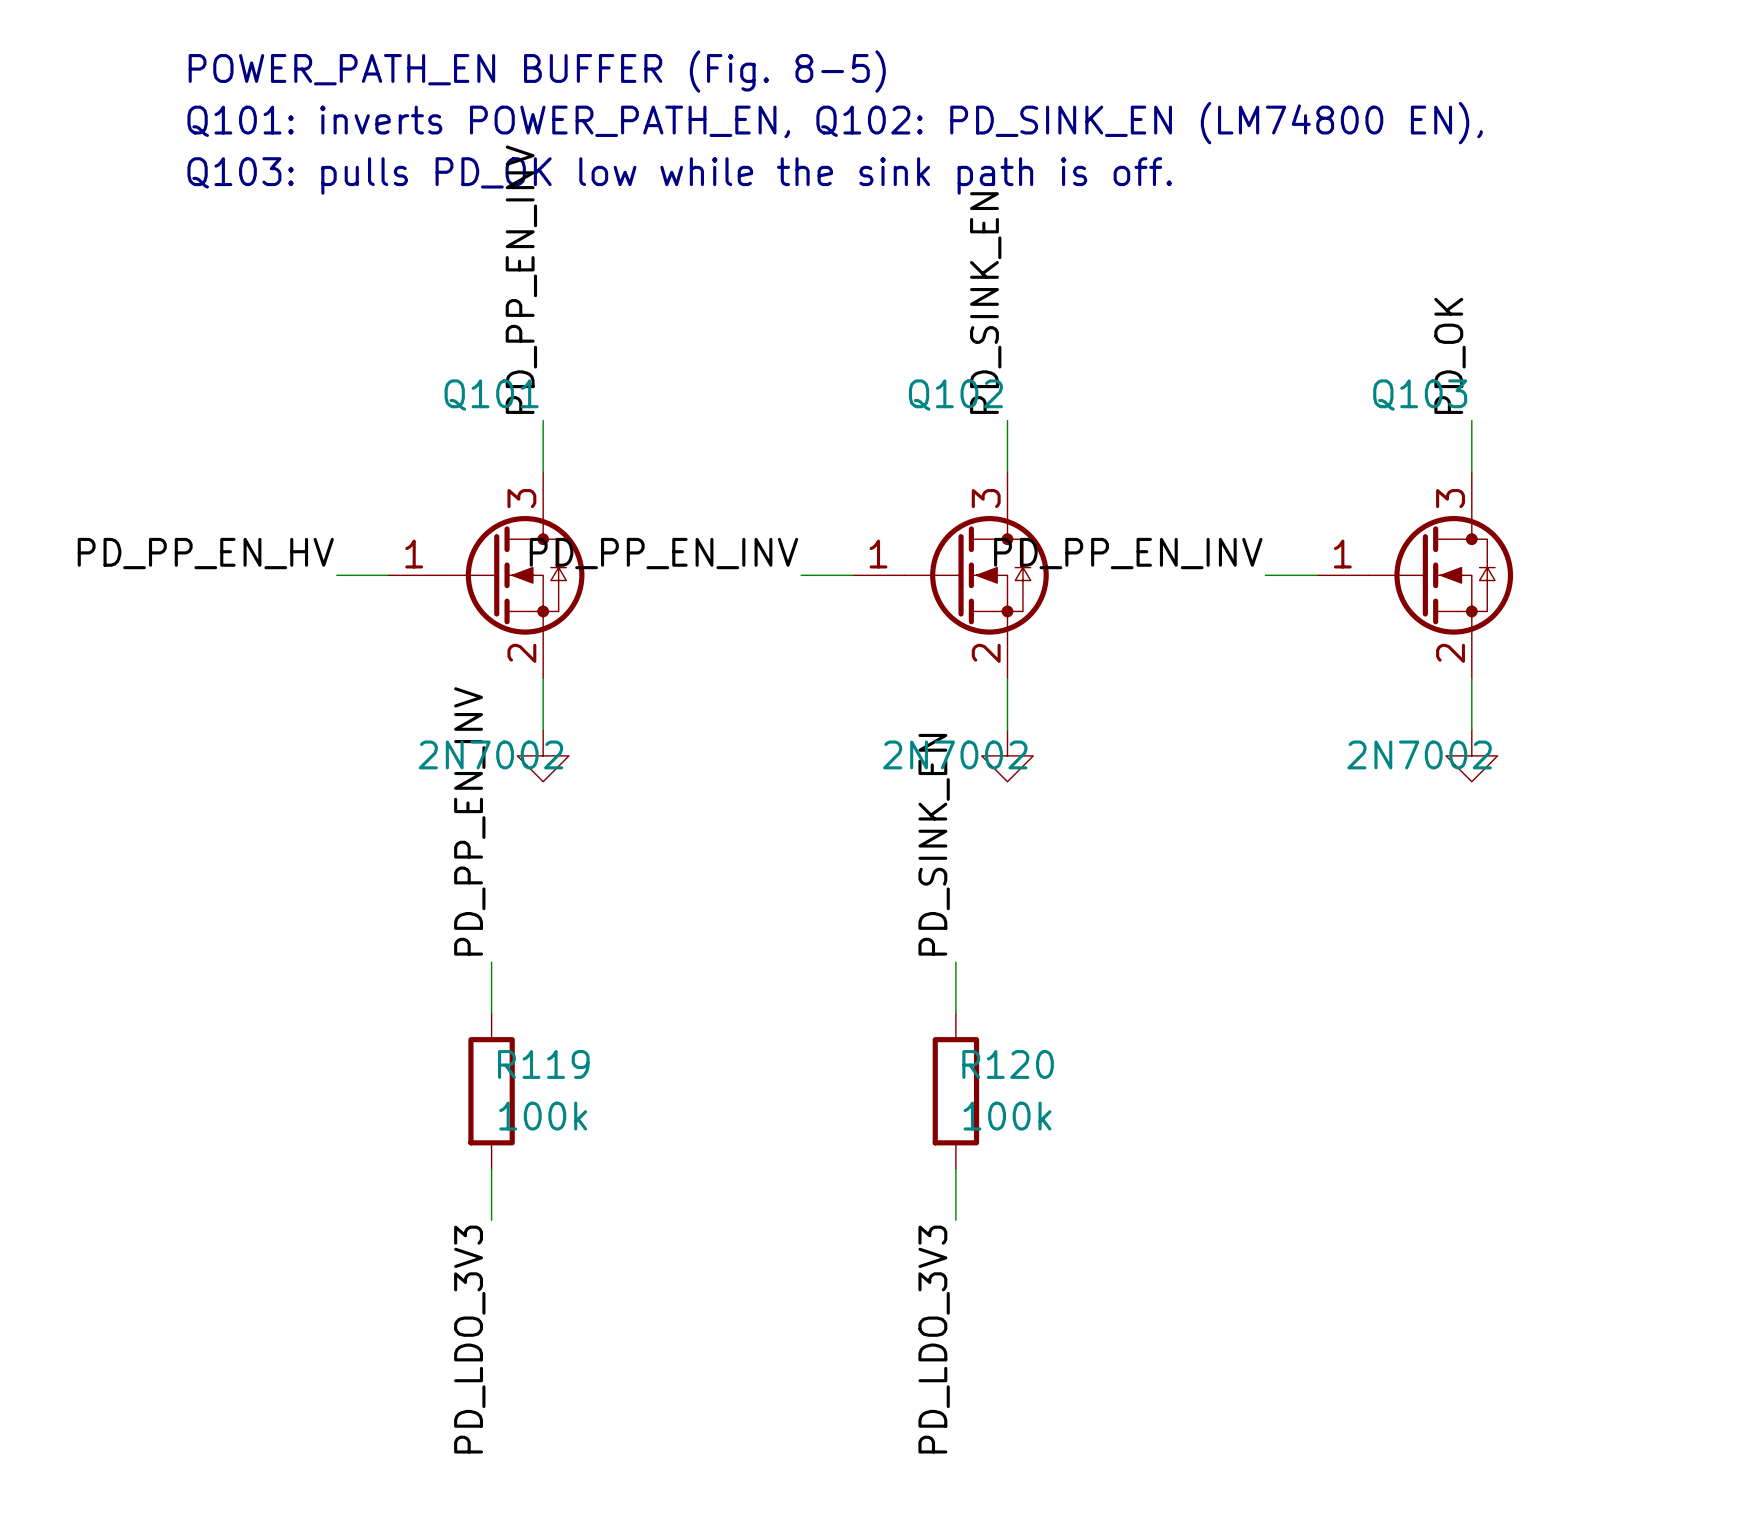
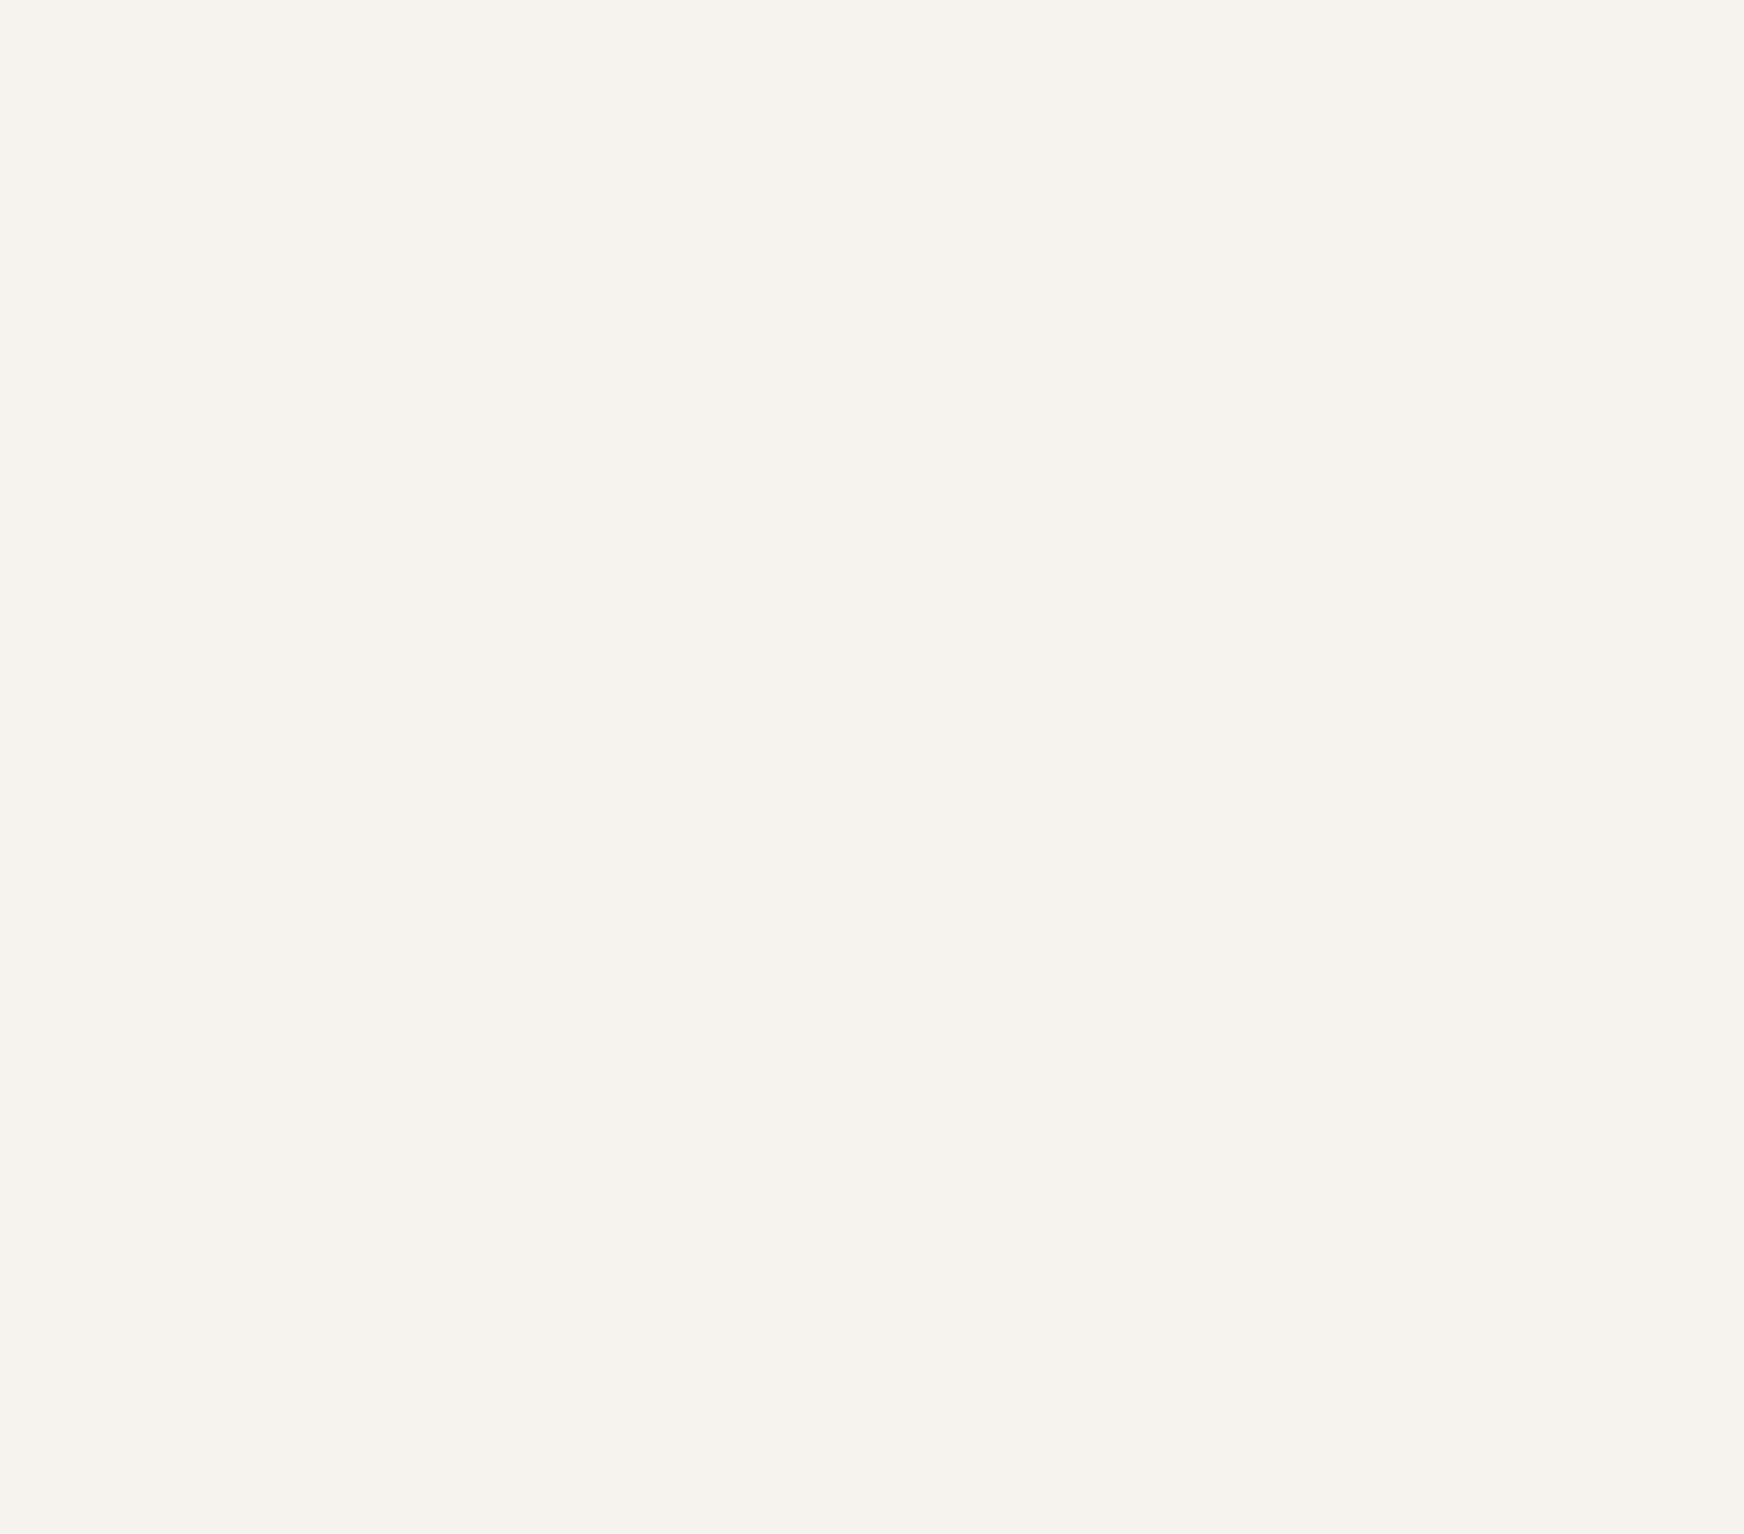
text: POWER_PATH_EN BUFFER (Fig. 8-5) (537, 71) -> none
text: Q101: inverts POWER_PATH_EN, Q102: PD_SINK_EN (LM74800 EN), (835, 123) -> none
text: Q103: pulls PD_OK low while the sink path is off. (679, 175) -> none
label: PD_PP_EN_INV (521, 279) -> none
label: PD_SINK_EN (985, 303) -> none
label: PD_OK (1450, 355) -> none
wire: (543, 420) (543, 472) -> none
wire: (1007, 420) (1007, 472) -> none
wire: (1471, 420) (1471, 472) -> none
label: PD_PP_EN_HV (205, 553) -> none
label: PD_PP_EN_INV (663, 553) -> none
label: PD_PP_EN_INV (1128, 553) -> none
wire: (336, 575) (388, 575) -> none
Q101: 2N7002 (486, 575) -> none
wire: (801, 575) (852, 575) -> none
Q102: 2N7002 (950, 575) -> none
wire: (1265, 575) (1317, 575) -> none
Q103: 2N7002 (1415, 575) -> none
wire: (543, 678) (543, 730) -> none
wire: (1007, 678) (1007, 730) -> none
wire: (1471, 678) (1471, 730) -> none
power symbol: (543, 755) -> none
power symbol: (1007, 755) -> none
power symbol: (1471, 755) -> none
label: PD_PP_EN_INV (469, 821) -> none
label: PD_SINK_EN (934, 844) -> none
wire: (491, 962) (491, 1013) -> none
wire: (955, 962) (955, 1013) -> none
R119: 100k (491, 1091) -> none
R120: 100k (955, 1091) -> none
wire: (491, 1168) (491, 1220) -> none
wire: (955, 1168) (955, 1220) -> none
label: PD_LDO_3V3 (469, 1339) -> none
label: PD_LDO_3V3 (934, 1339) -> none

